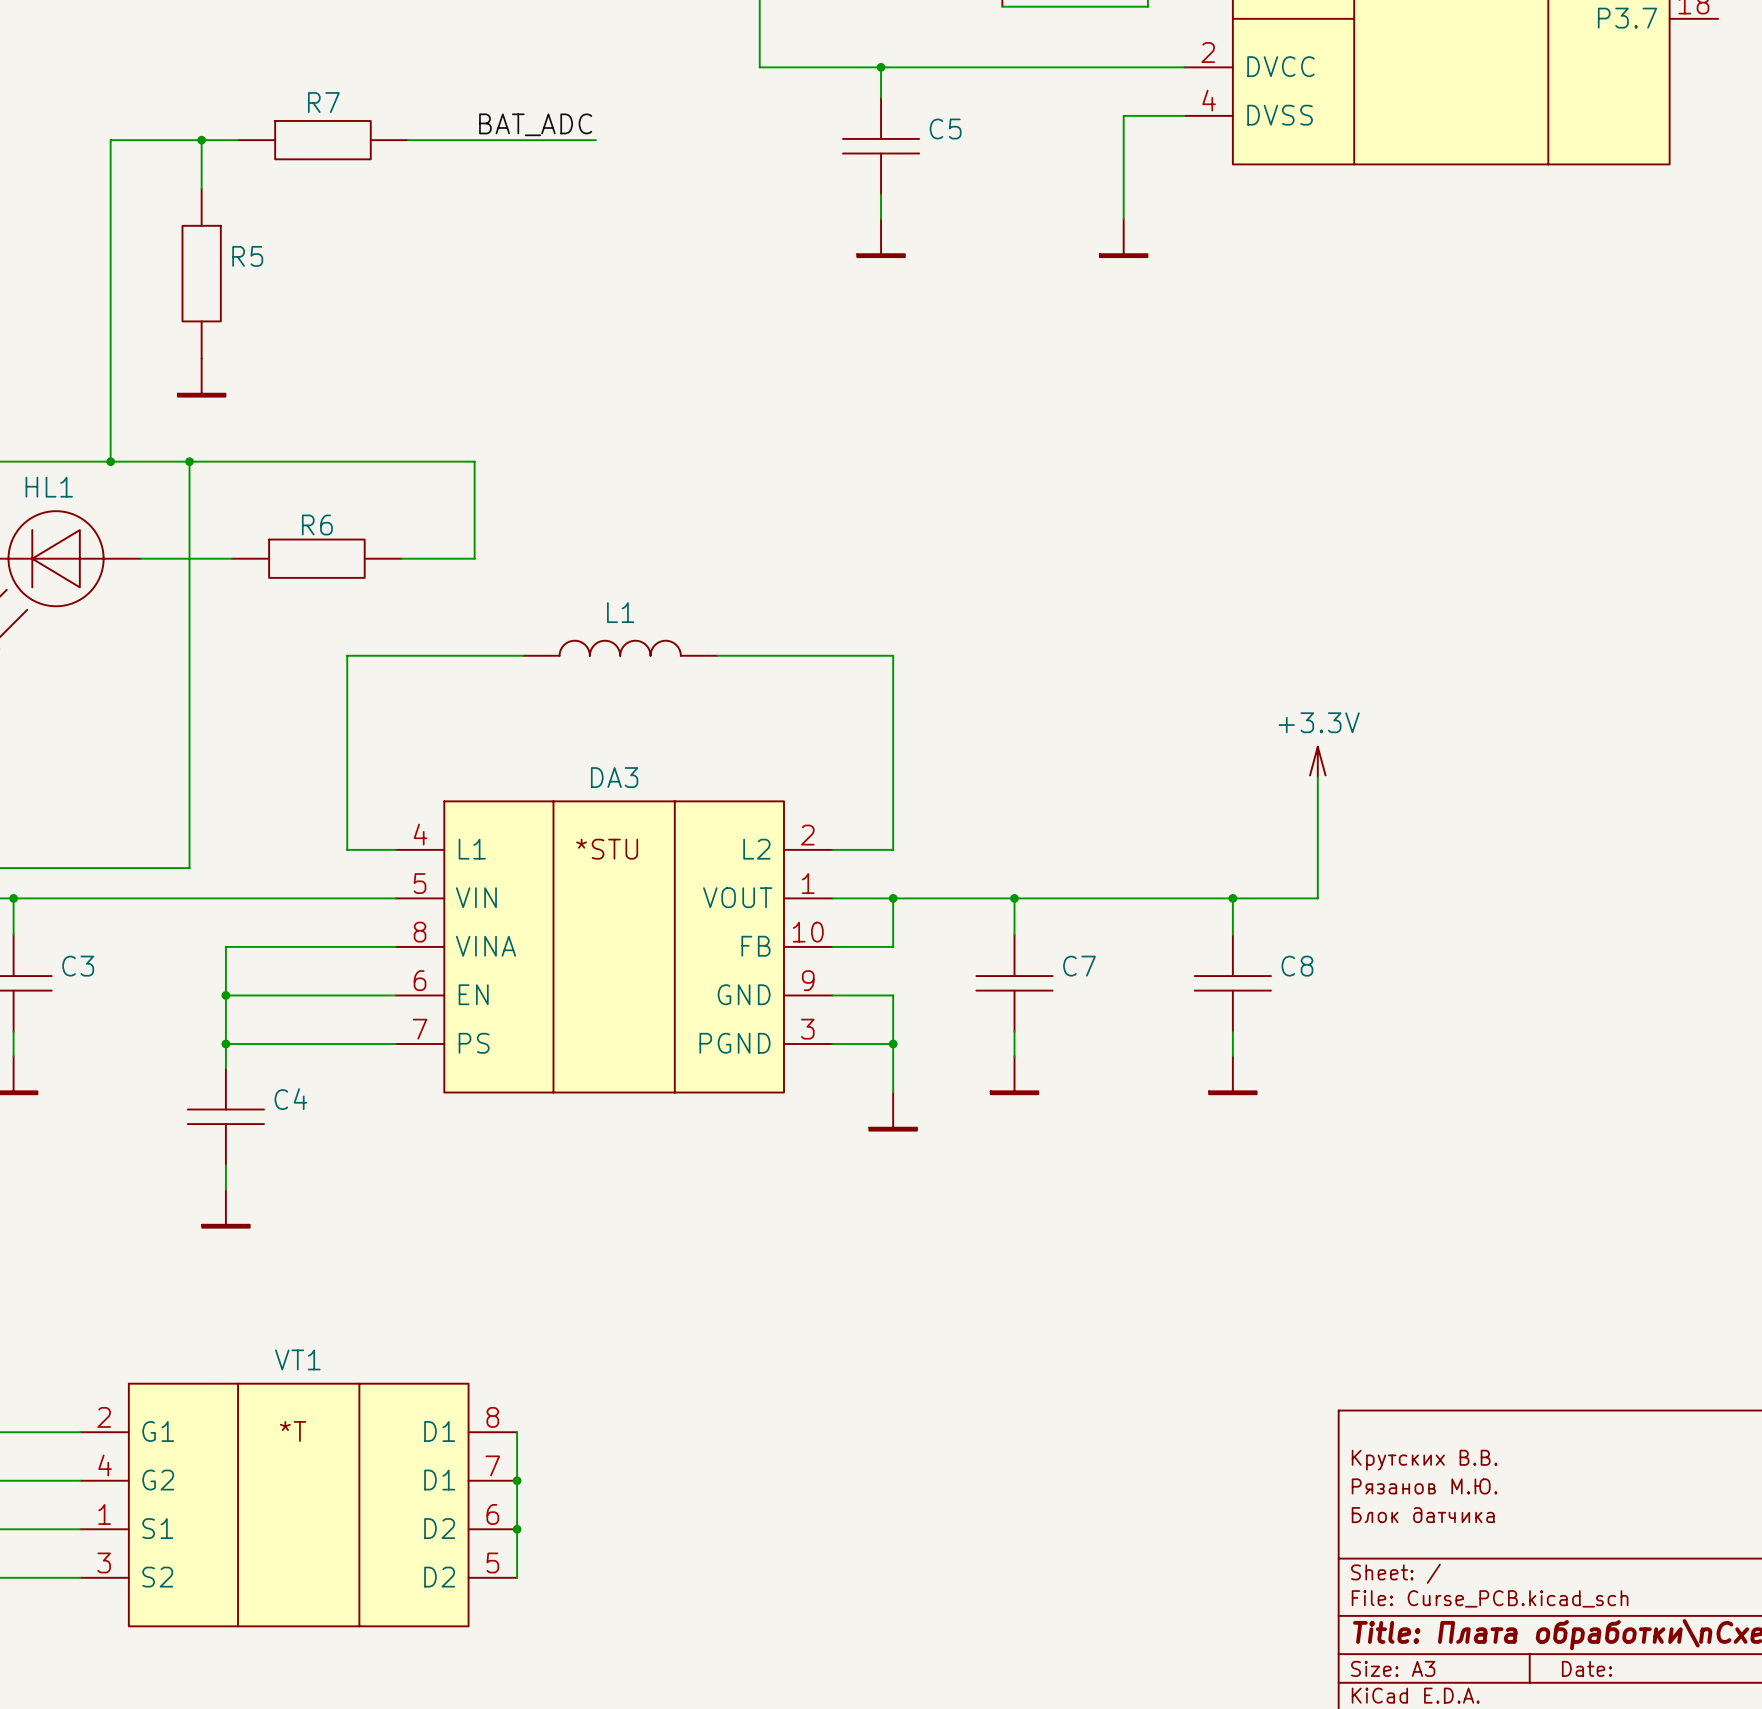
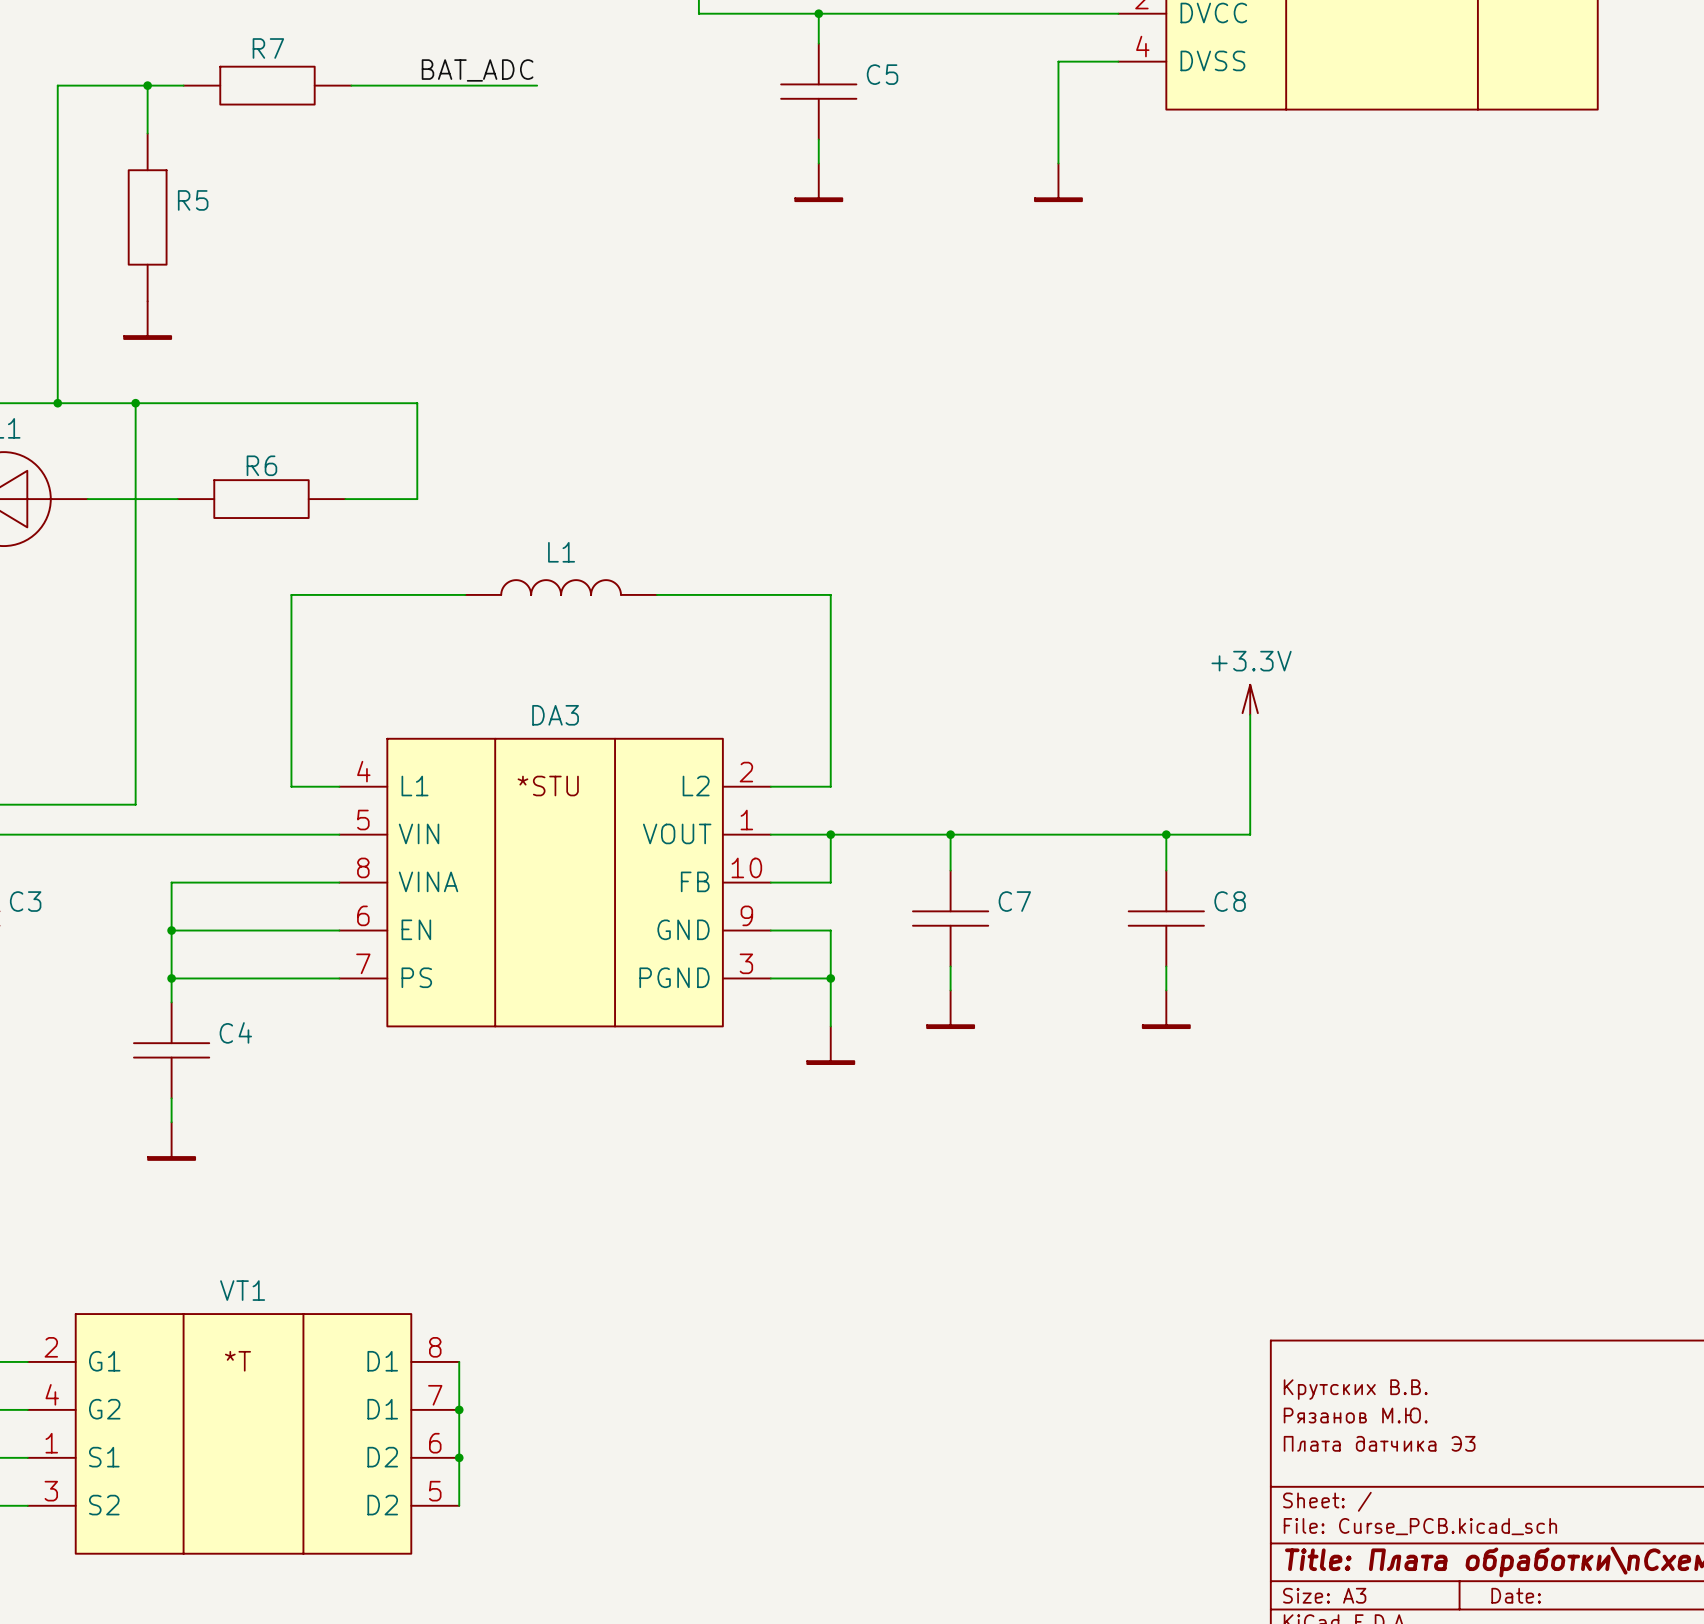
title block: Блок датчика (1423, 1515) -> Плата датчика Э3 (1379, 1443)

